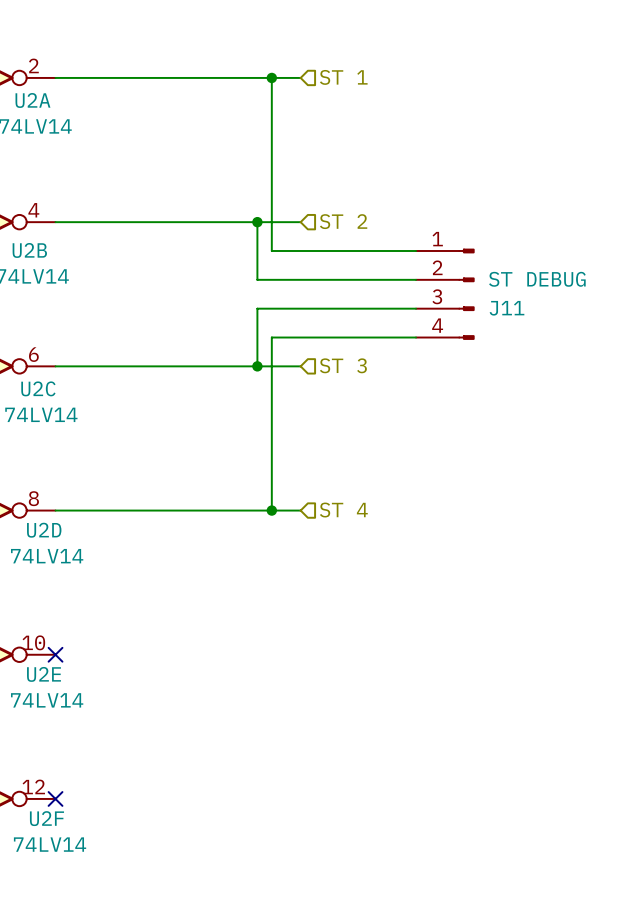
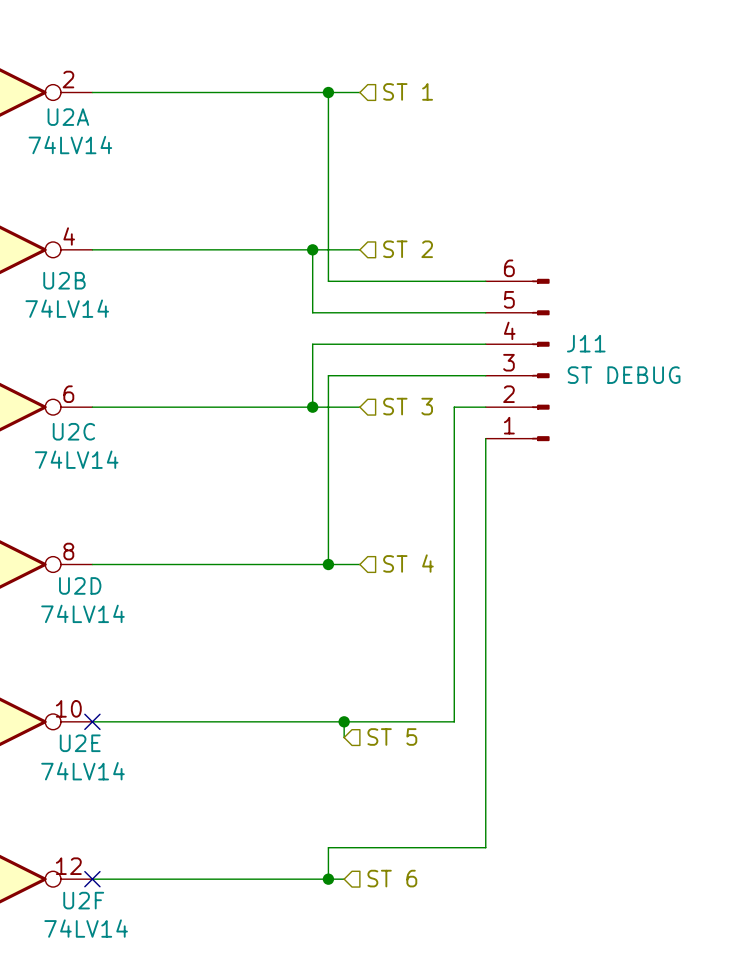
J11 symbol: [416, 248, 475, 340] -> [485, 278, 550, 442]
J11 value position: ST DEBUG (537, 279) -> ST DEBUG (624, 375)
wire: none -> (485, 407) (454, 407) (454, 721) (92, 721)
wire: none -> (485, 438) (485, 847) (328, 847) (328, 879)
wire: none -> (344, 721) (344, 737)
junction: none -> (344, 721)
hierarchical label: none -> ST 5 (392, 736)
wire: none -> (92, 879) (344, 879)
junction: none -> (328, 879)
hierarchical label: none -> ST 6 (392, 878)

